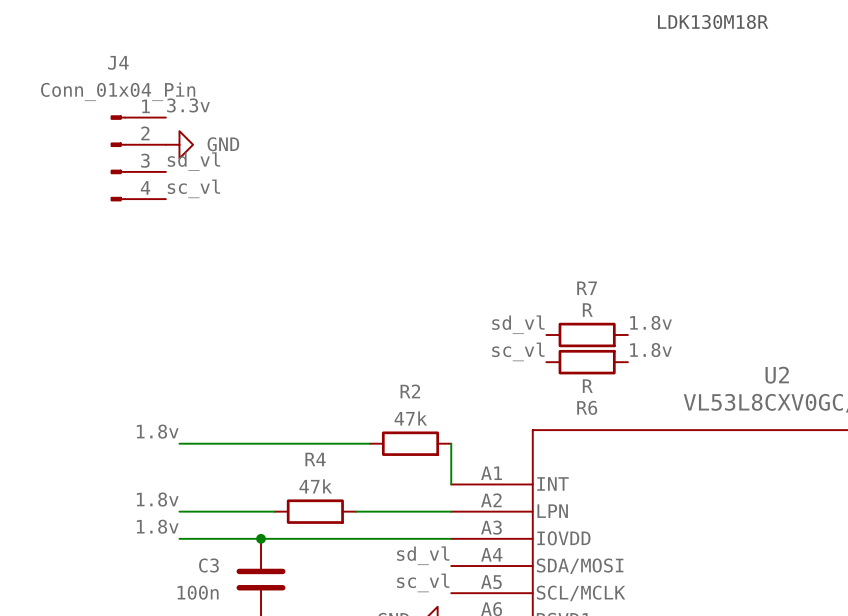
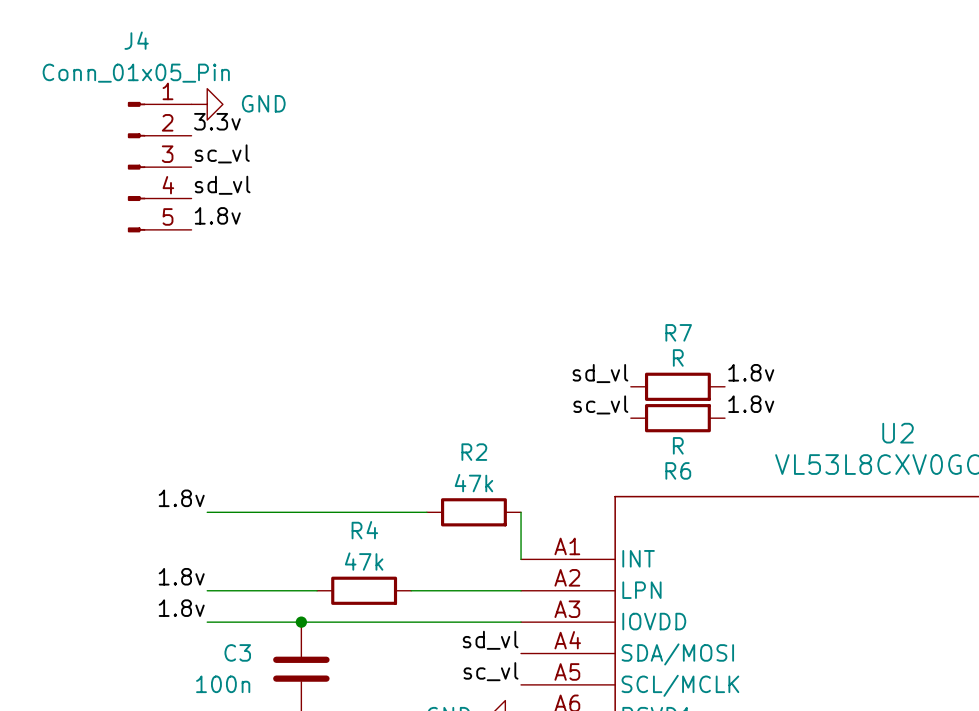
text: LDK130M18R (713, 22) -> none
J4 value: Conn_01x04_Pin (118, 91) -> Conn_01x05_Pin (136, 73)
J4 symbol: [110, 115, 166, 202] -> [127, 101, 192, 233]
label: none -> sc_vl (222, 153)
power symbol position: GND (179, 144) -> GND (207, 104)
label: sc_vl (194, 188) -> 1.8v (217, 215)

